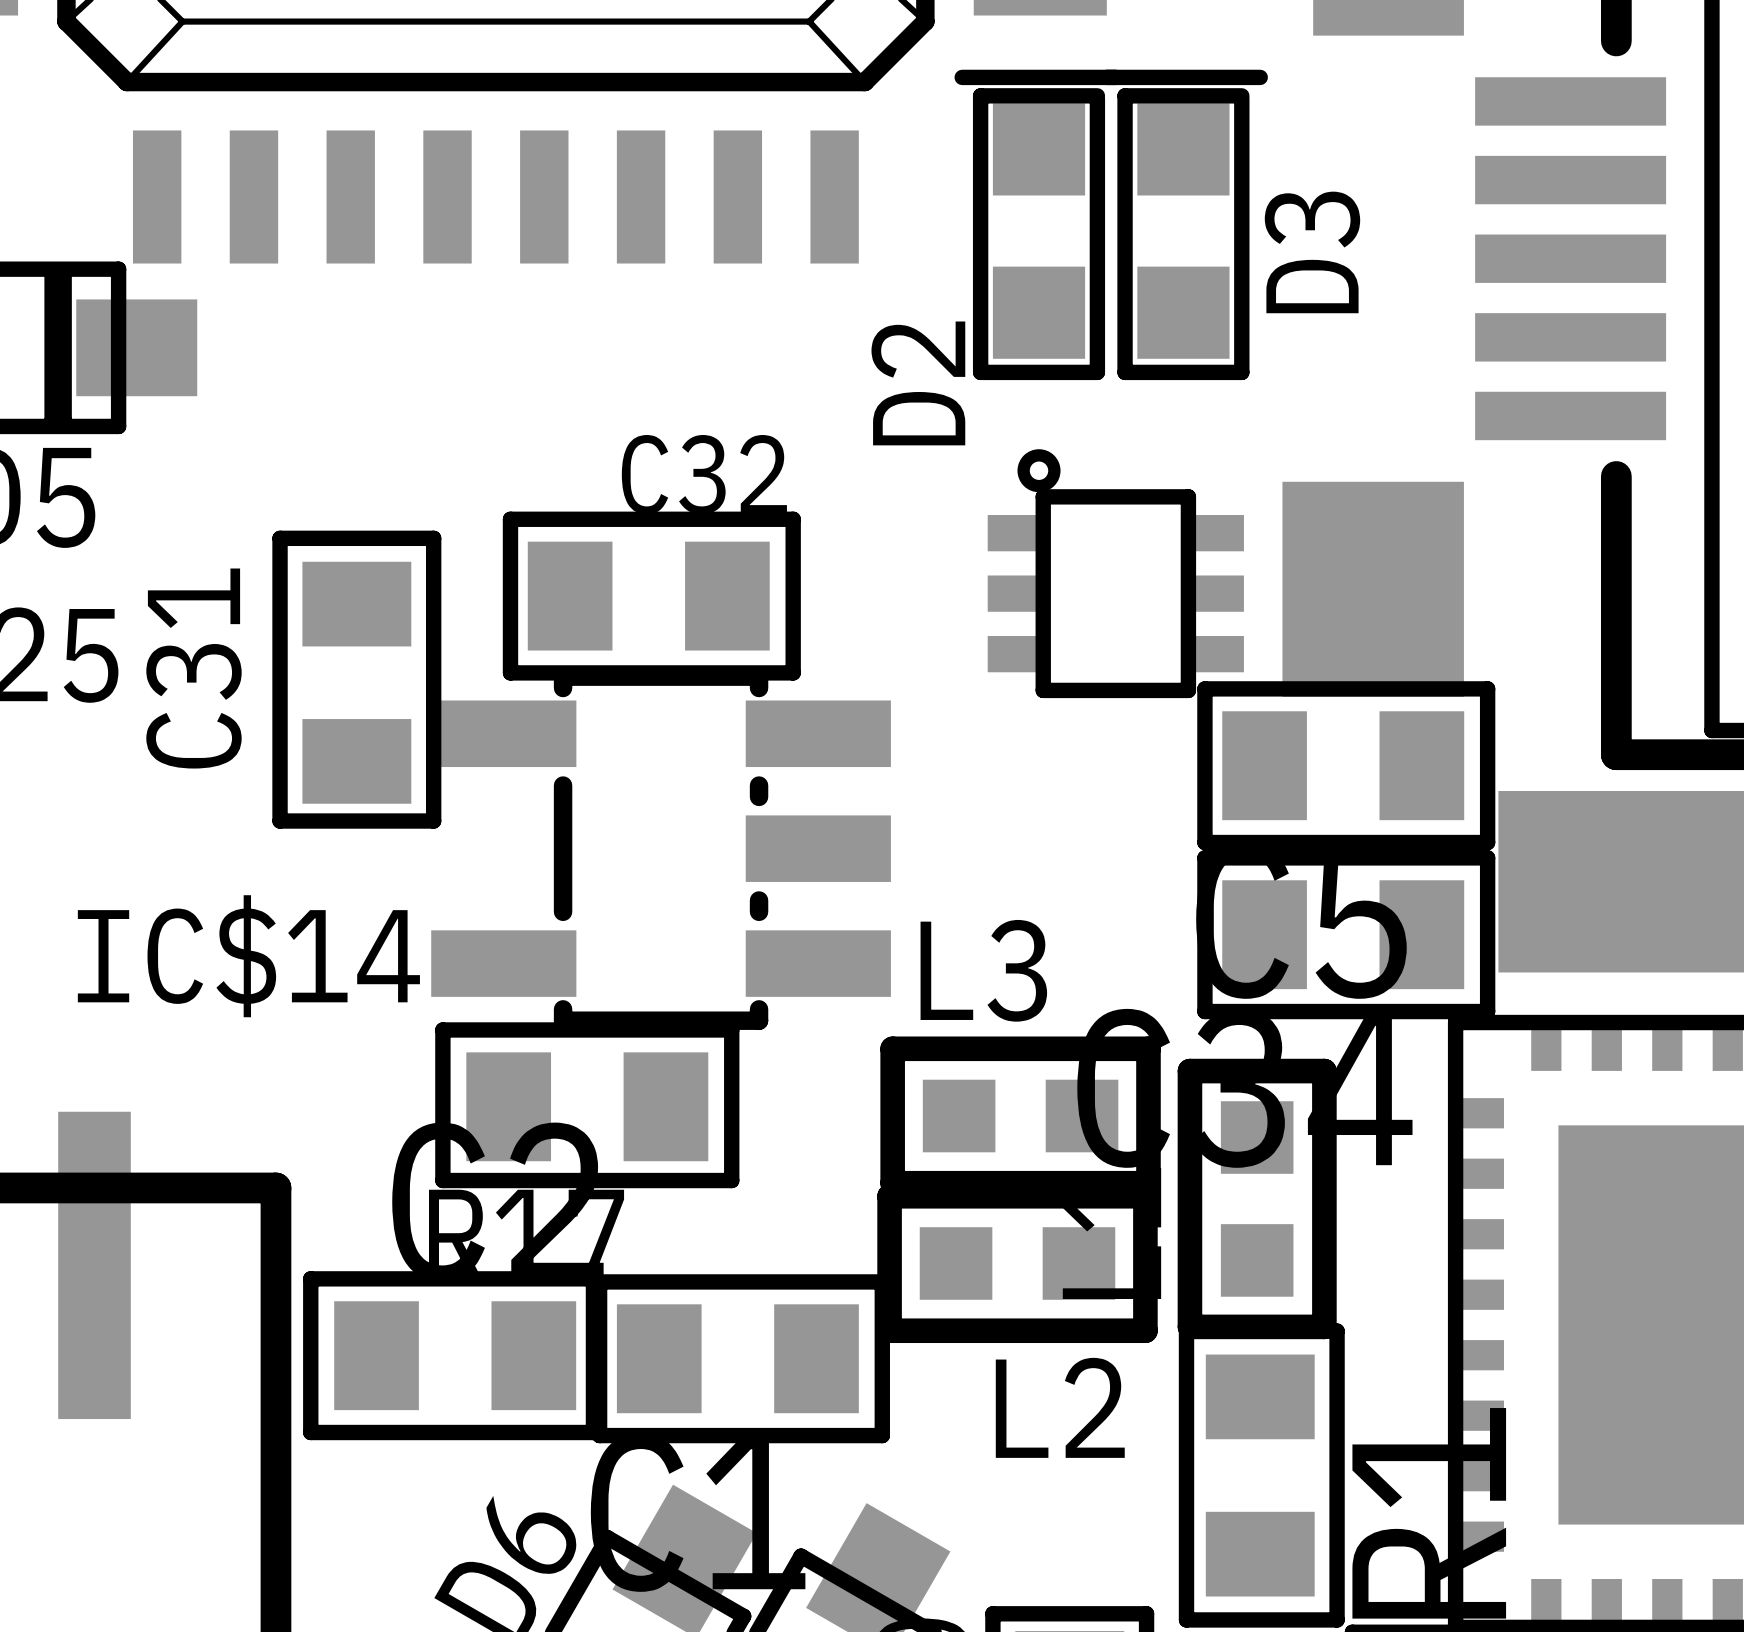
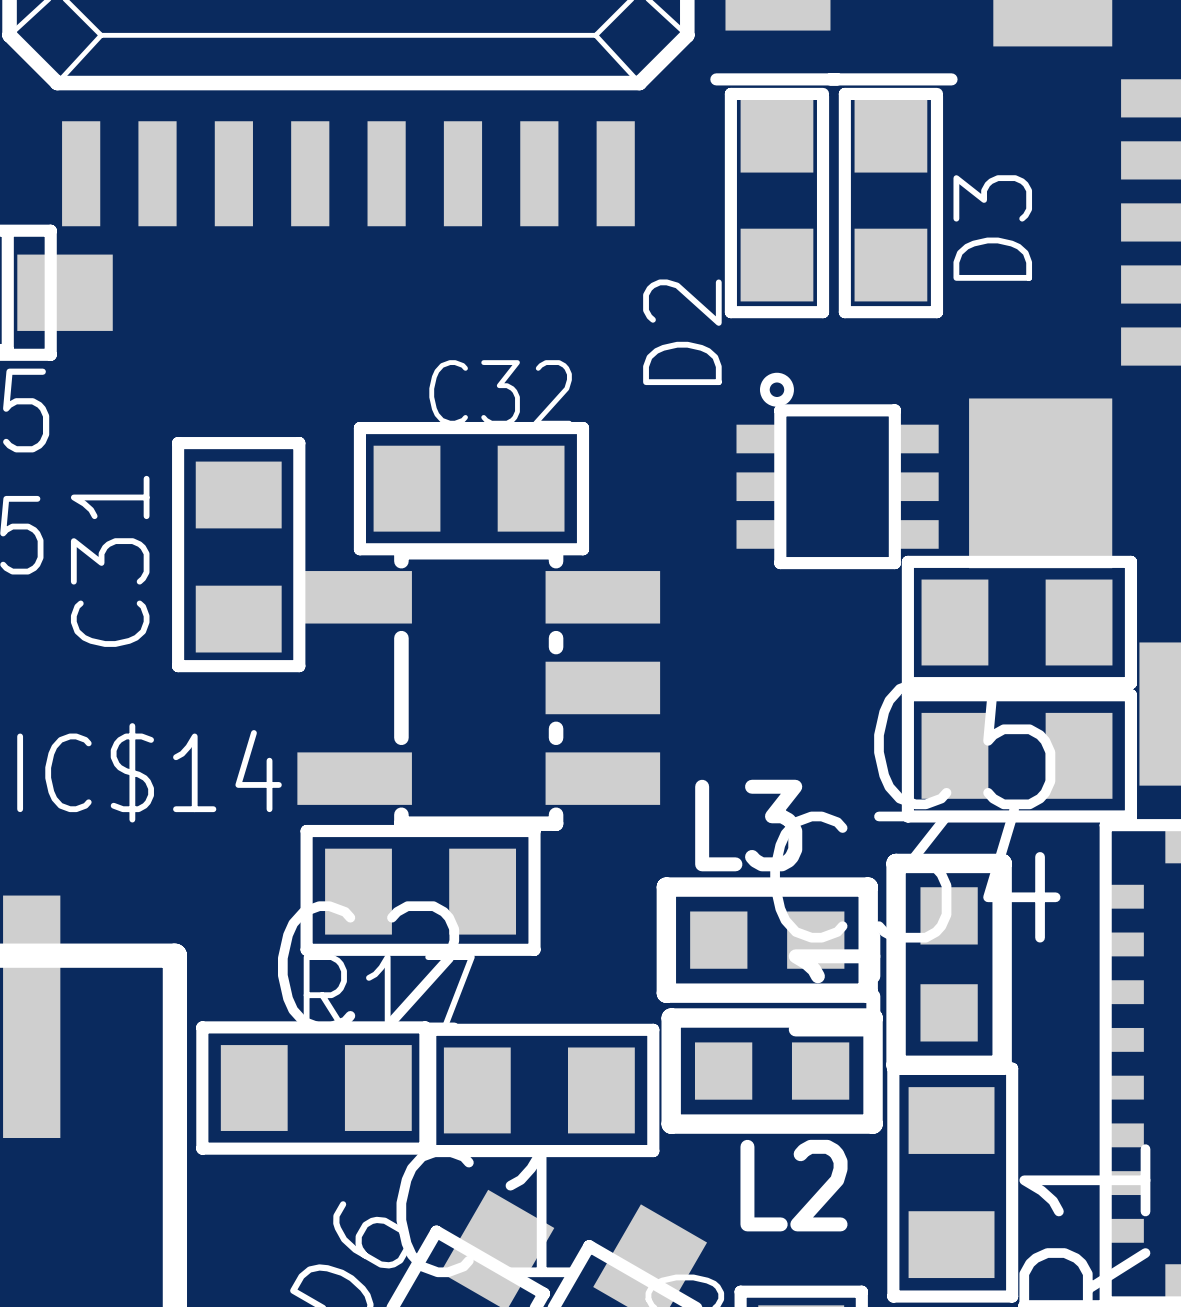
L3 position: (1020, 1116) -> (767, 940)
L2 position: (1017, 1263) -> (772, 1071)

